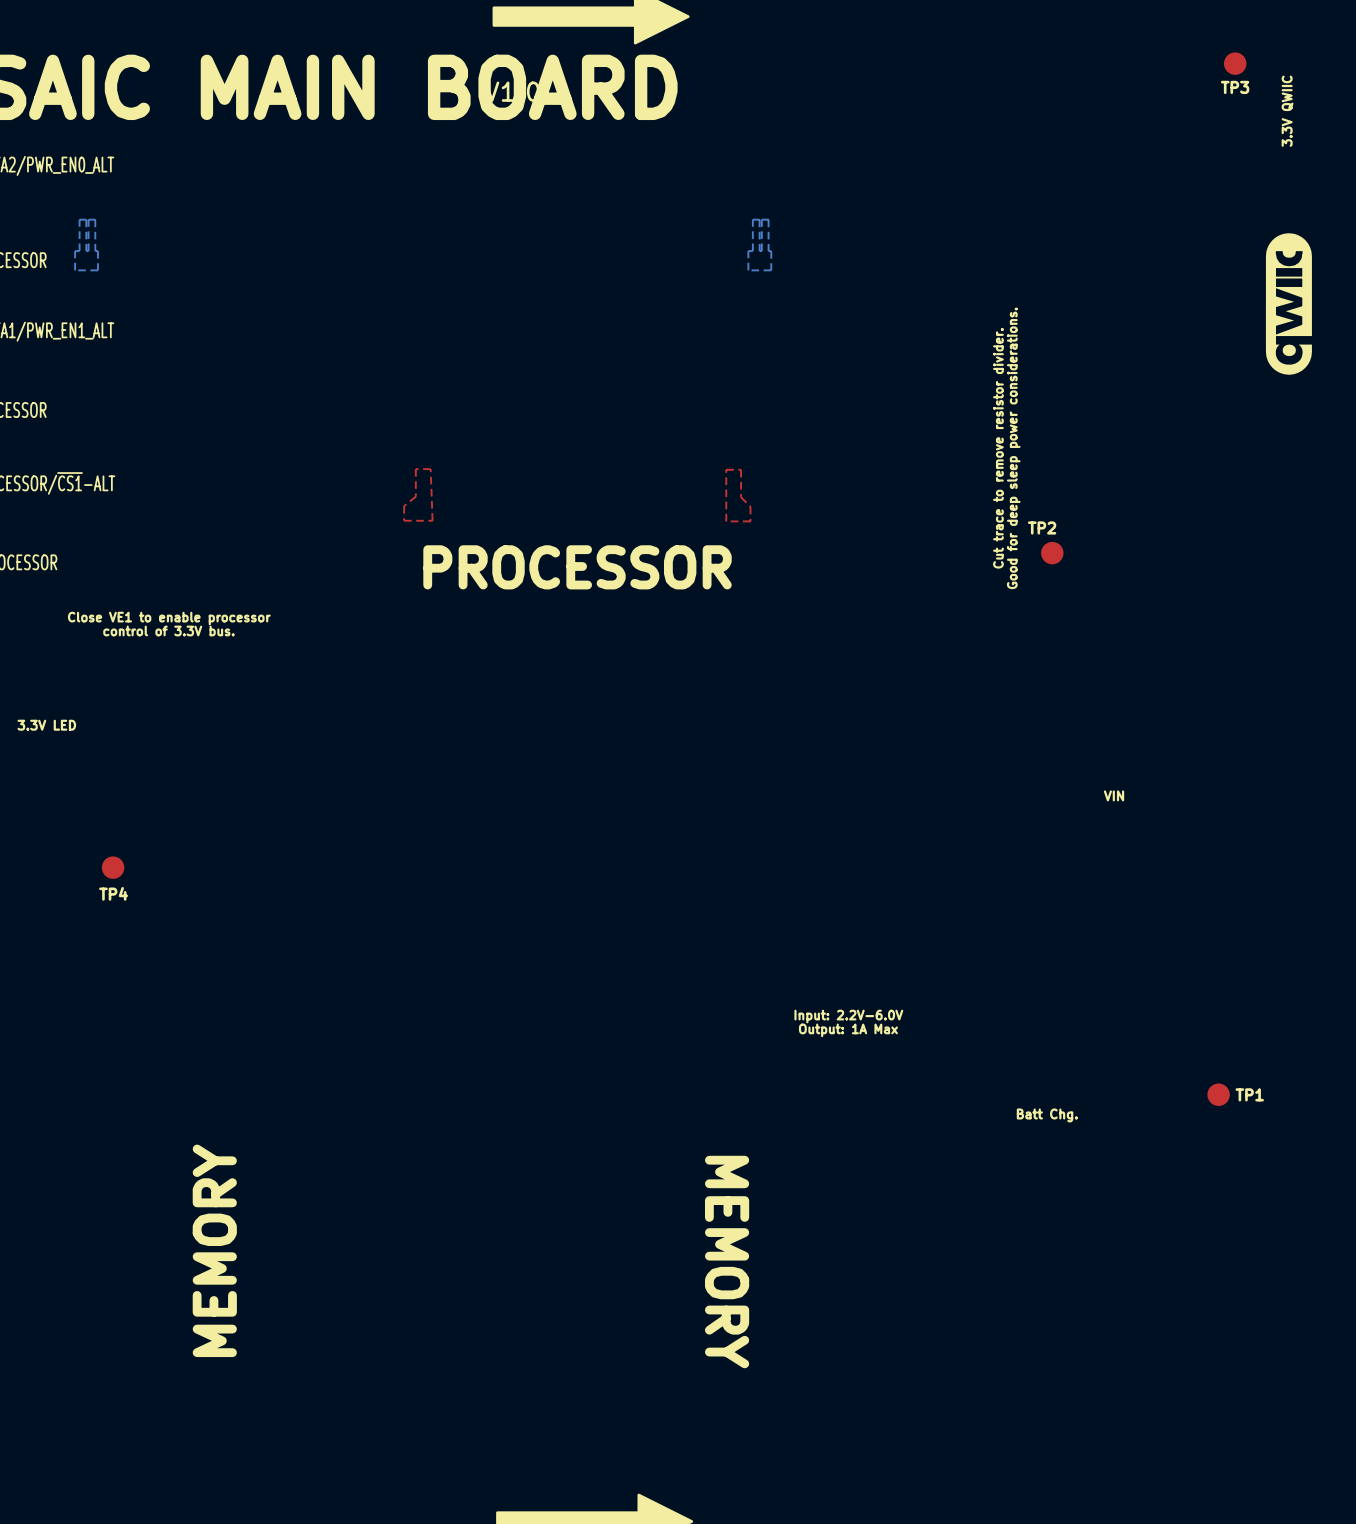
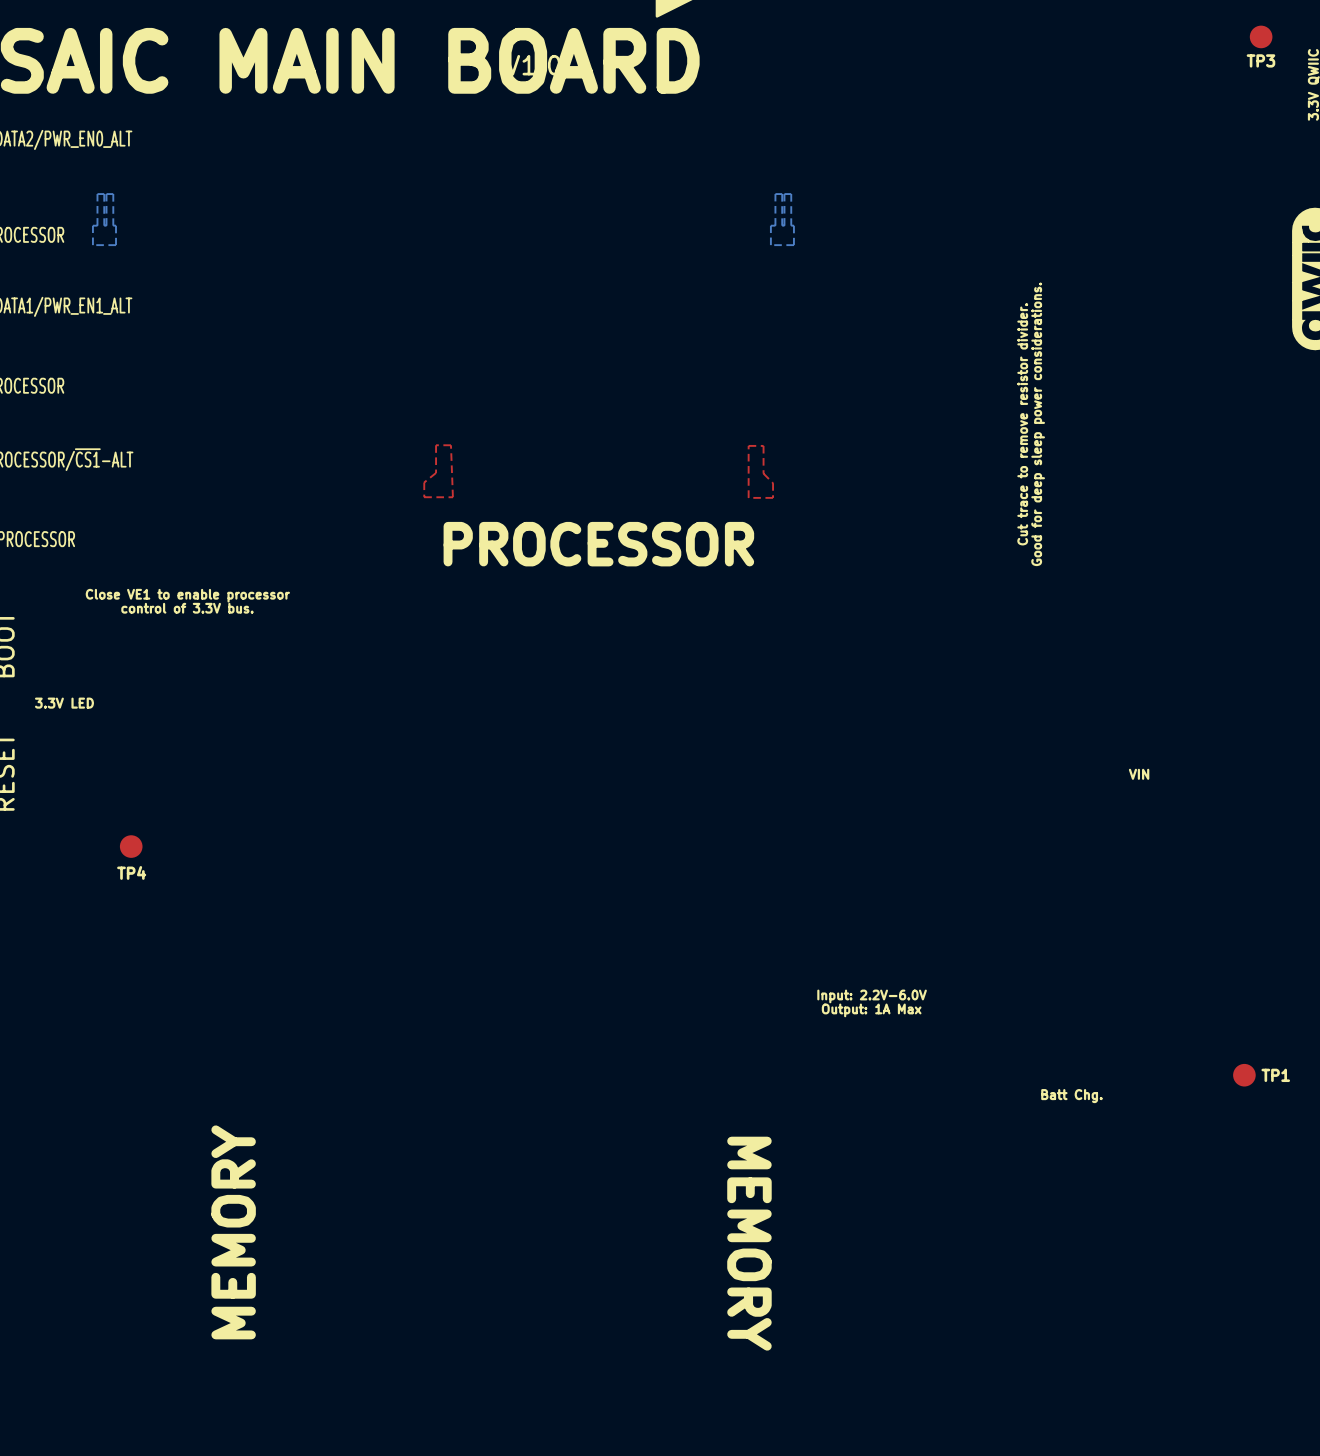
TP2: (1052, 553) -> none

